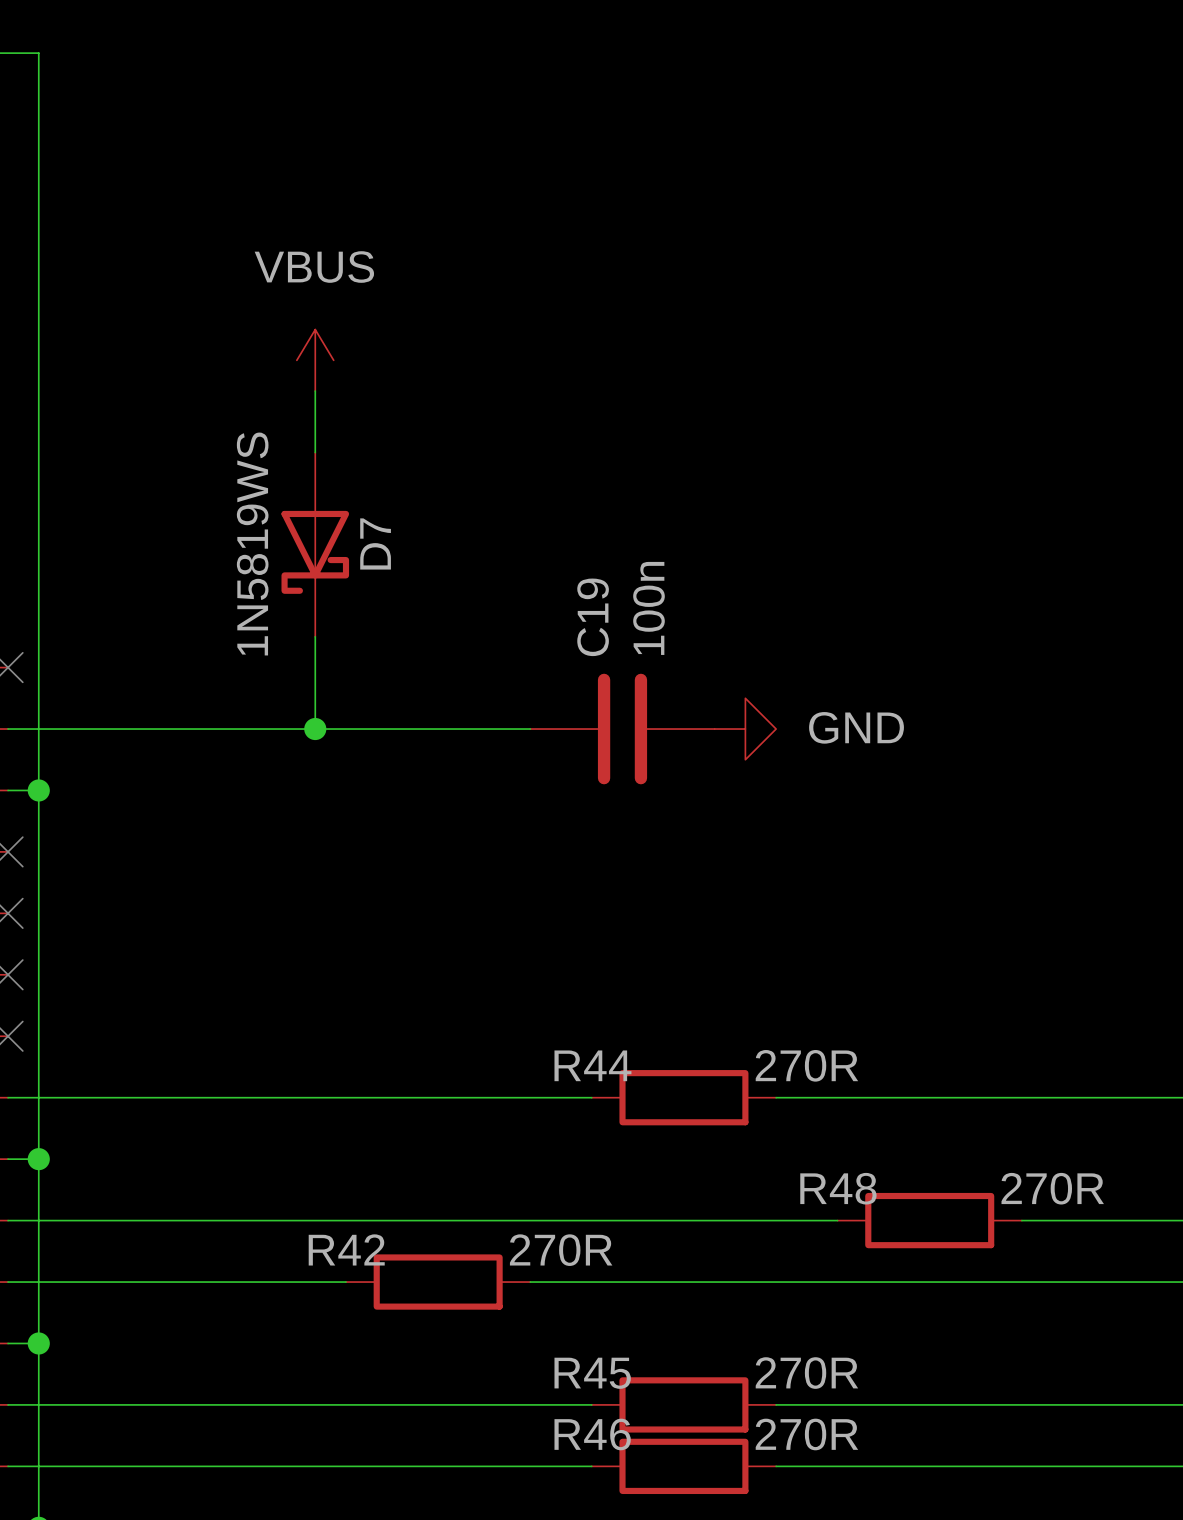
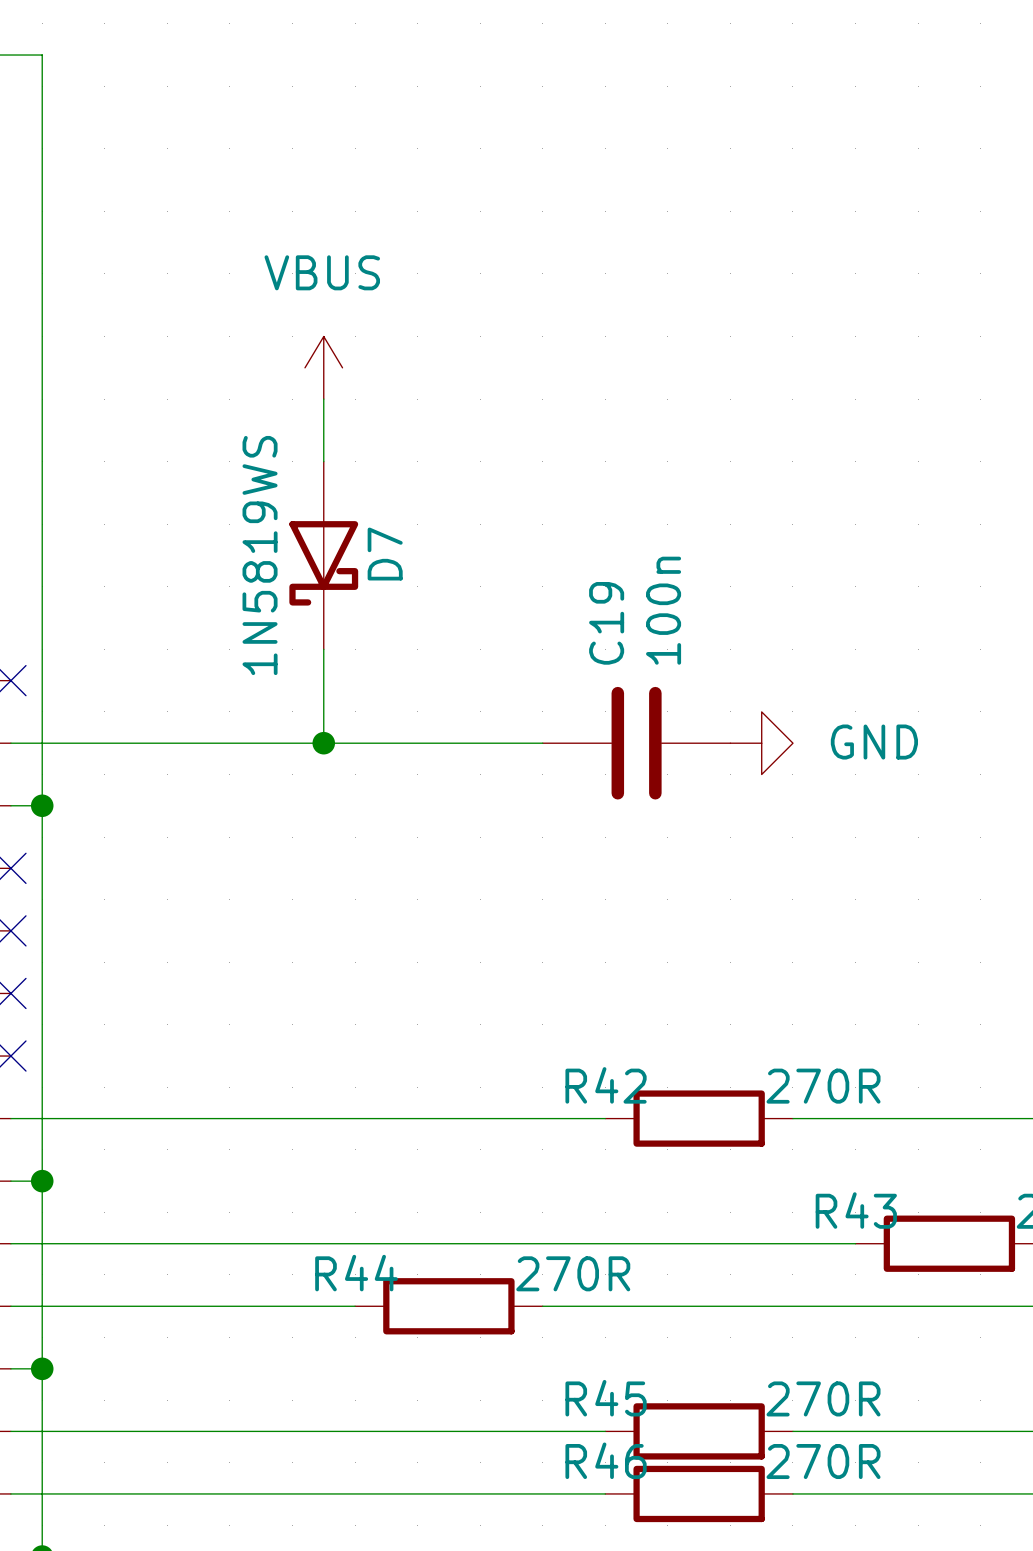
R44 name: R44 (592, 1065) -> R42 (606, 1085)
R48 name: R48 (838, 1188) -> R43 (856, 1210)
R42 name: R42 (346, 1249) -> R44 (356, 1273)

